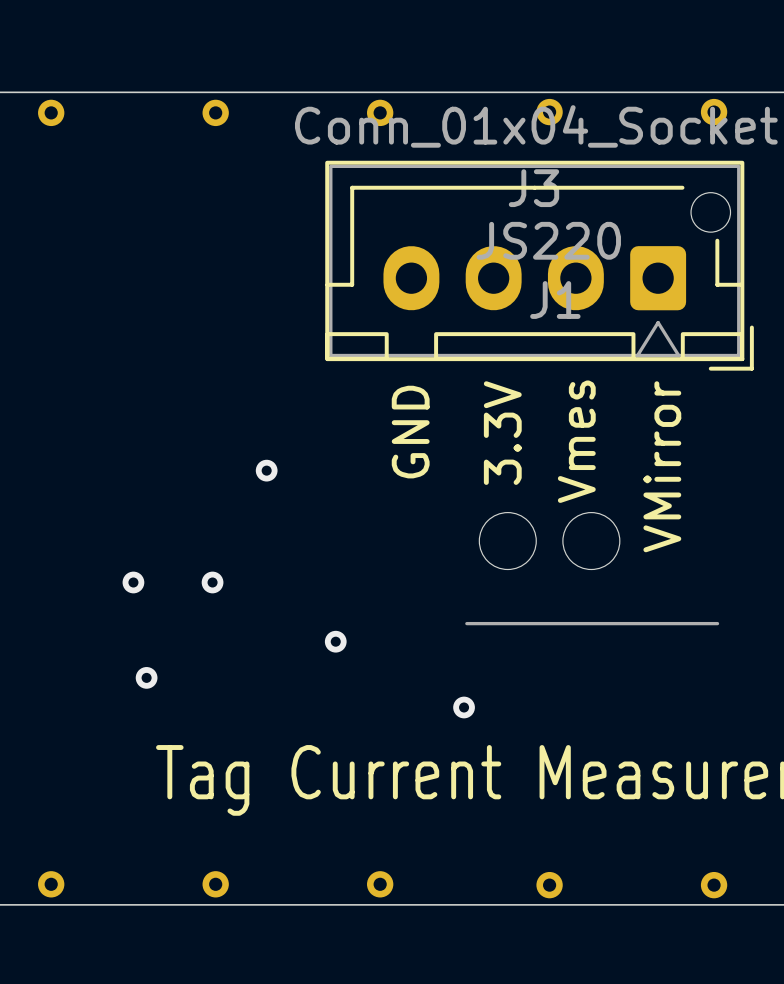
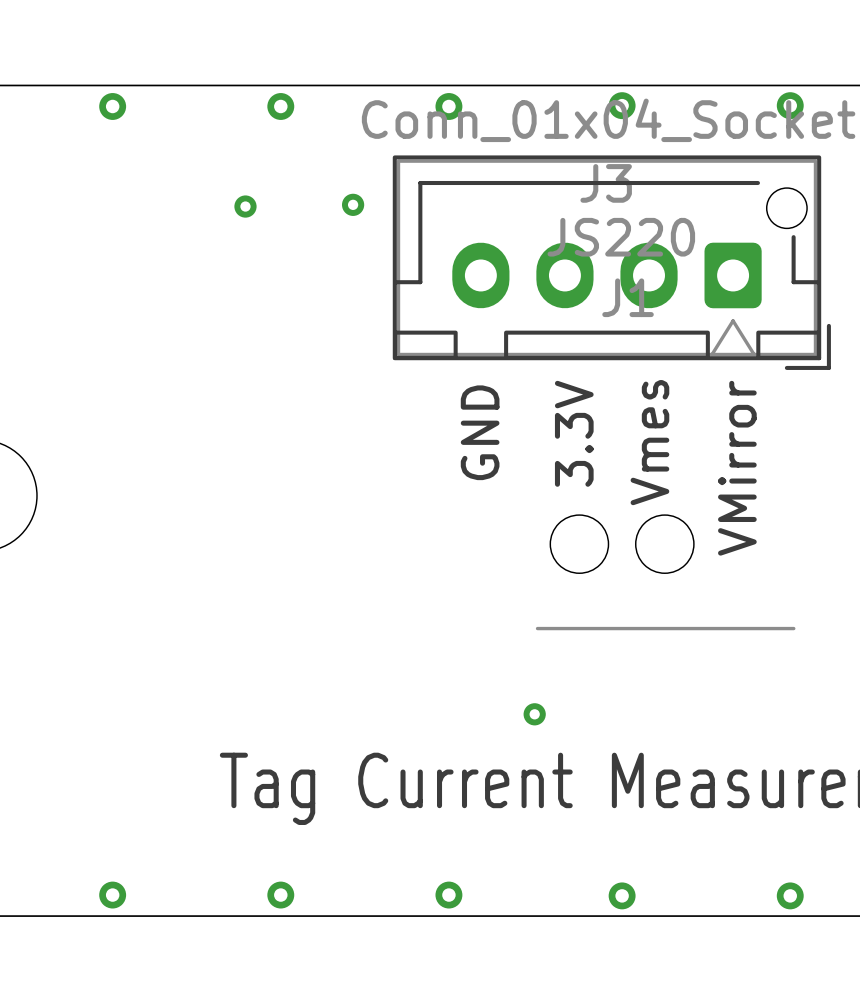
via: none -> (353, 204)
via: none -> (245, 206)
via: (266, 470) -> none
via: (133, 582) -> none
via: (212, 582) -> none
via: (335, 641) -> none
via: (146, 677) -> none

